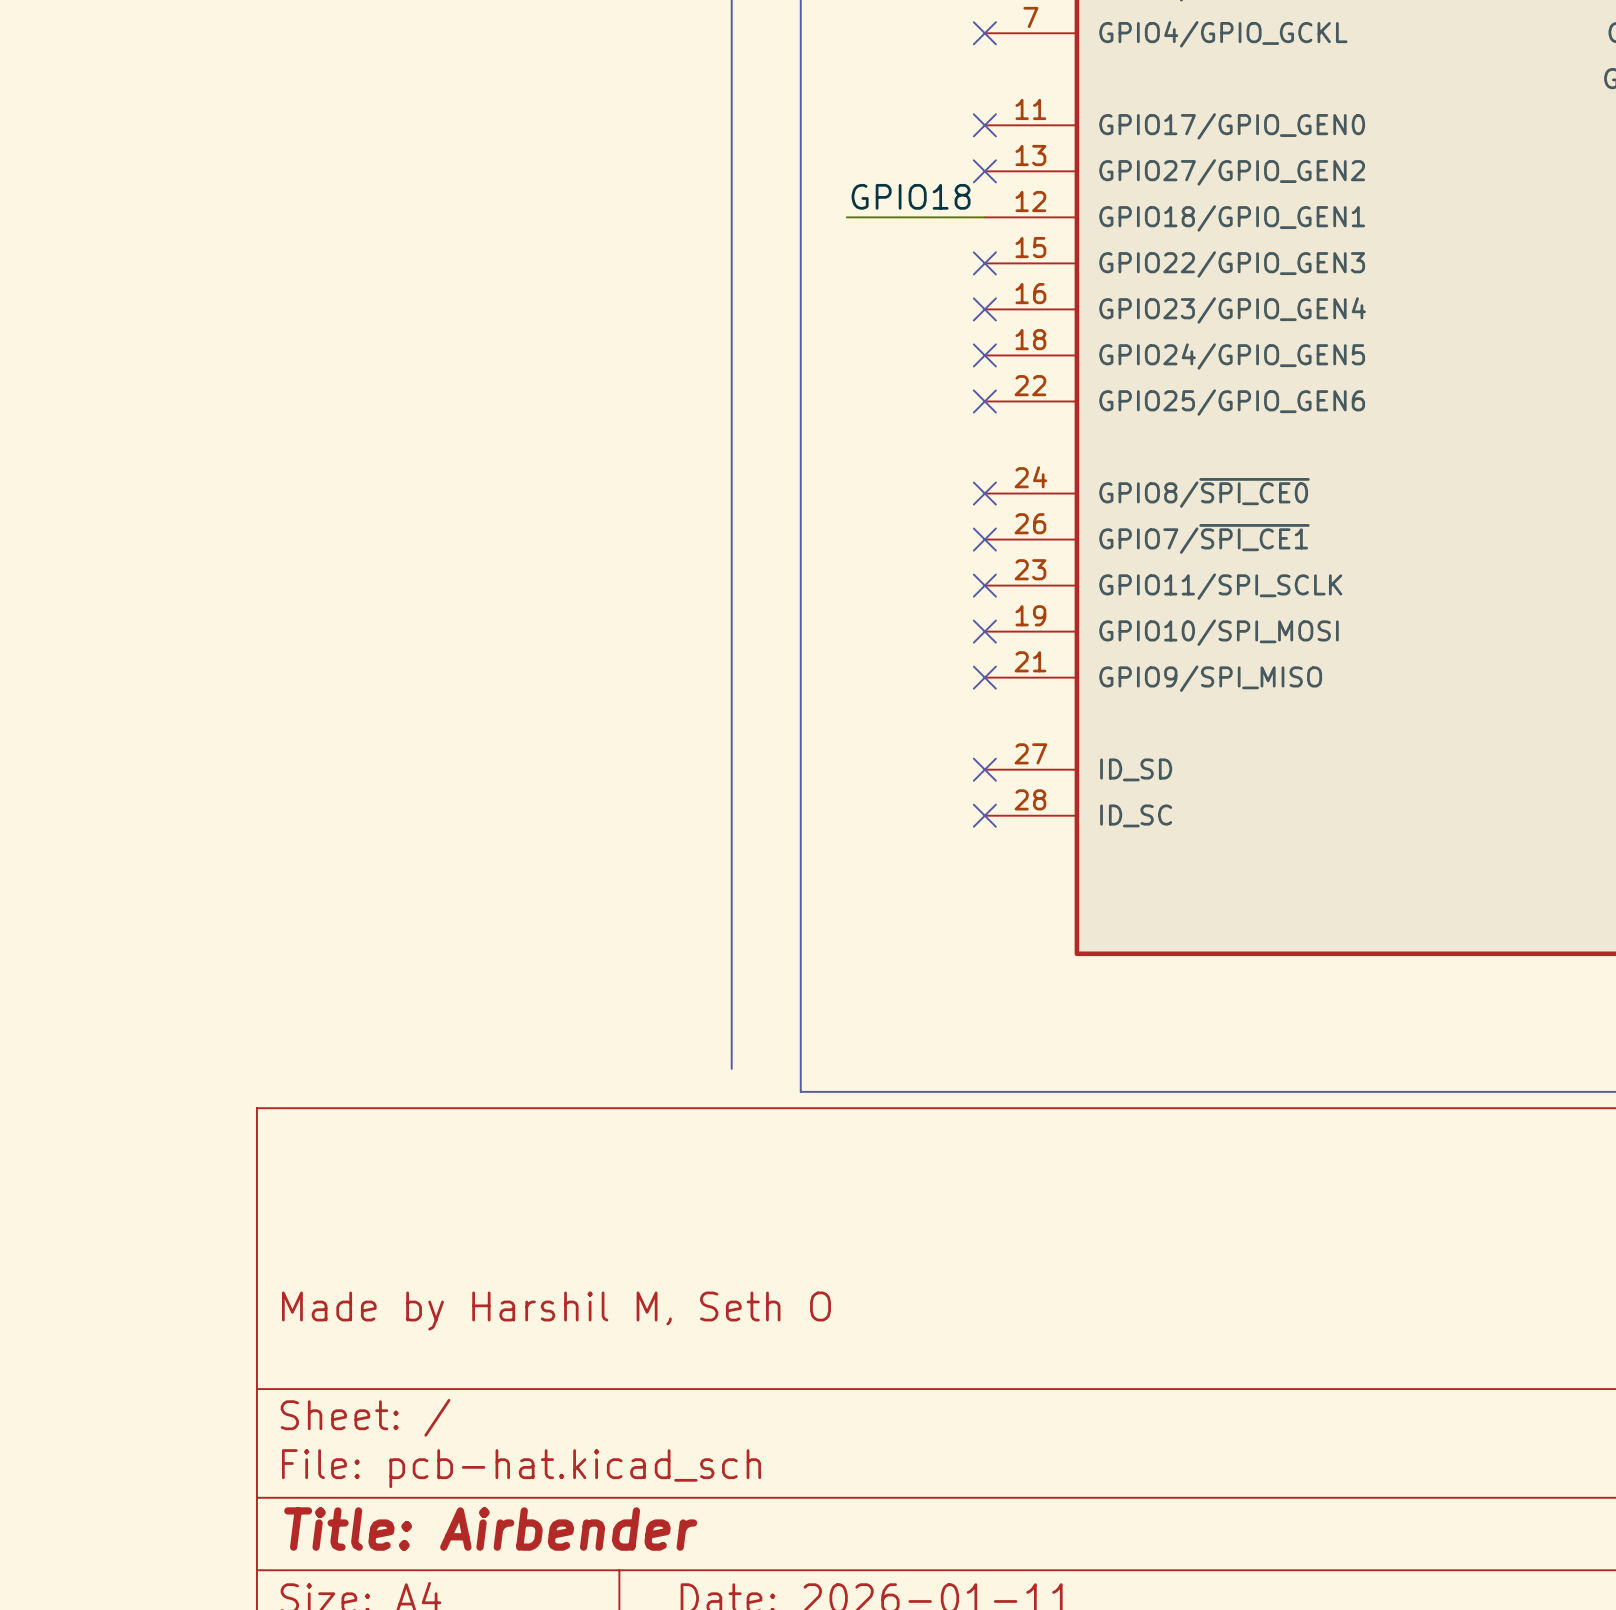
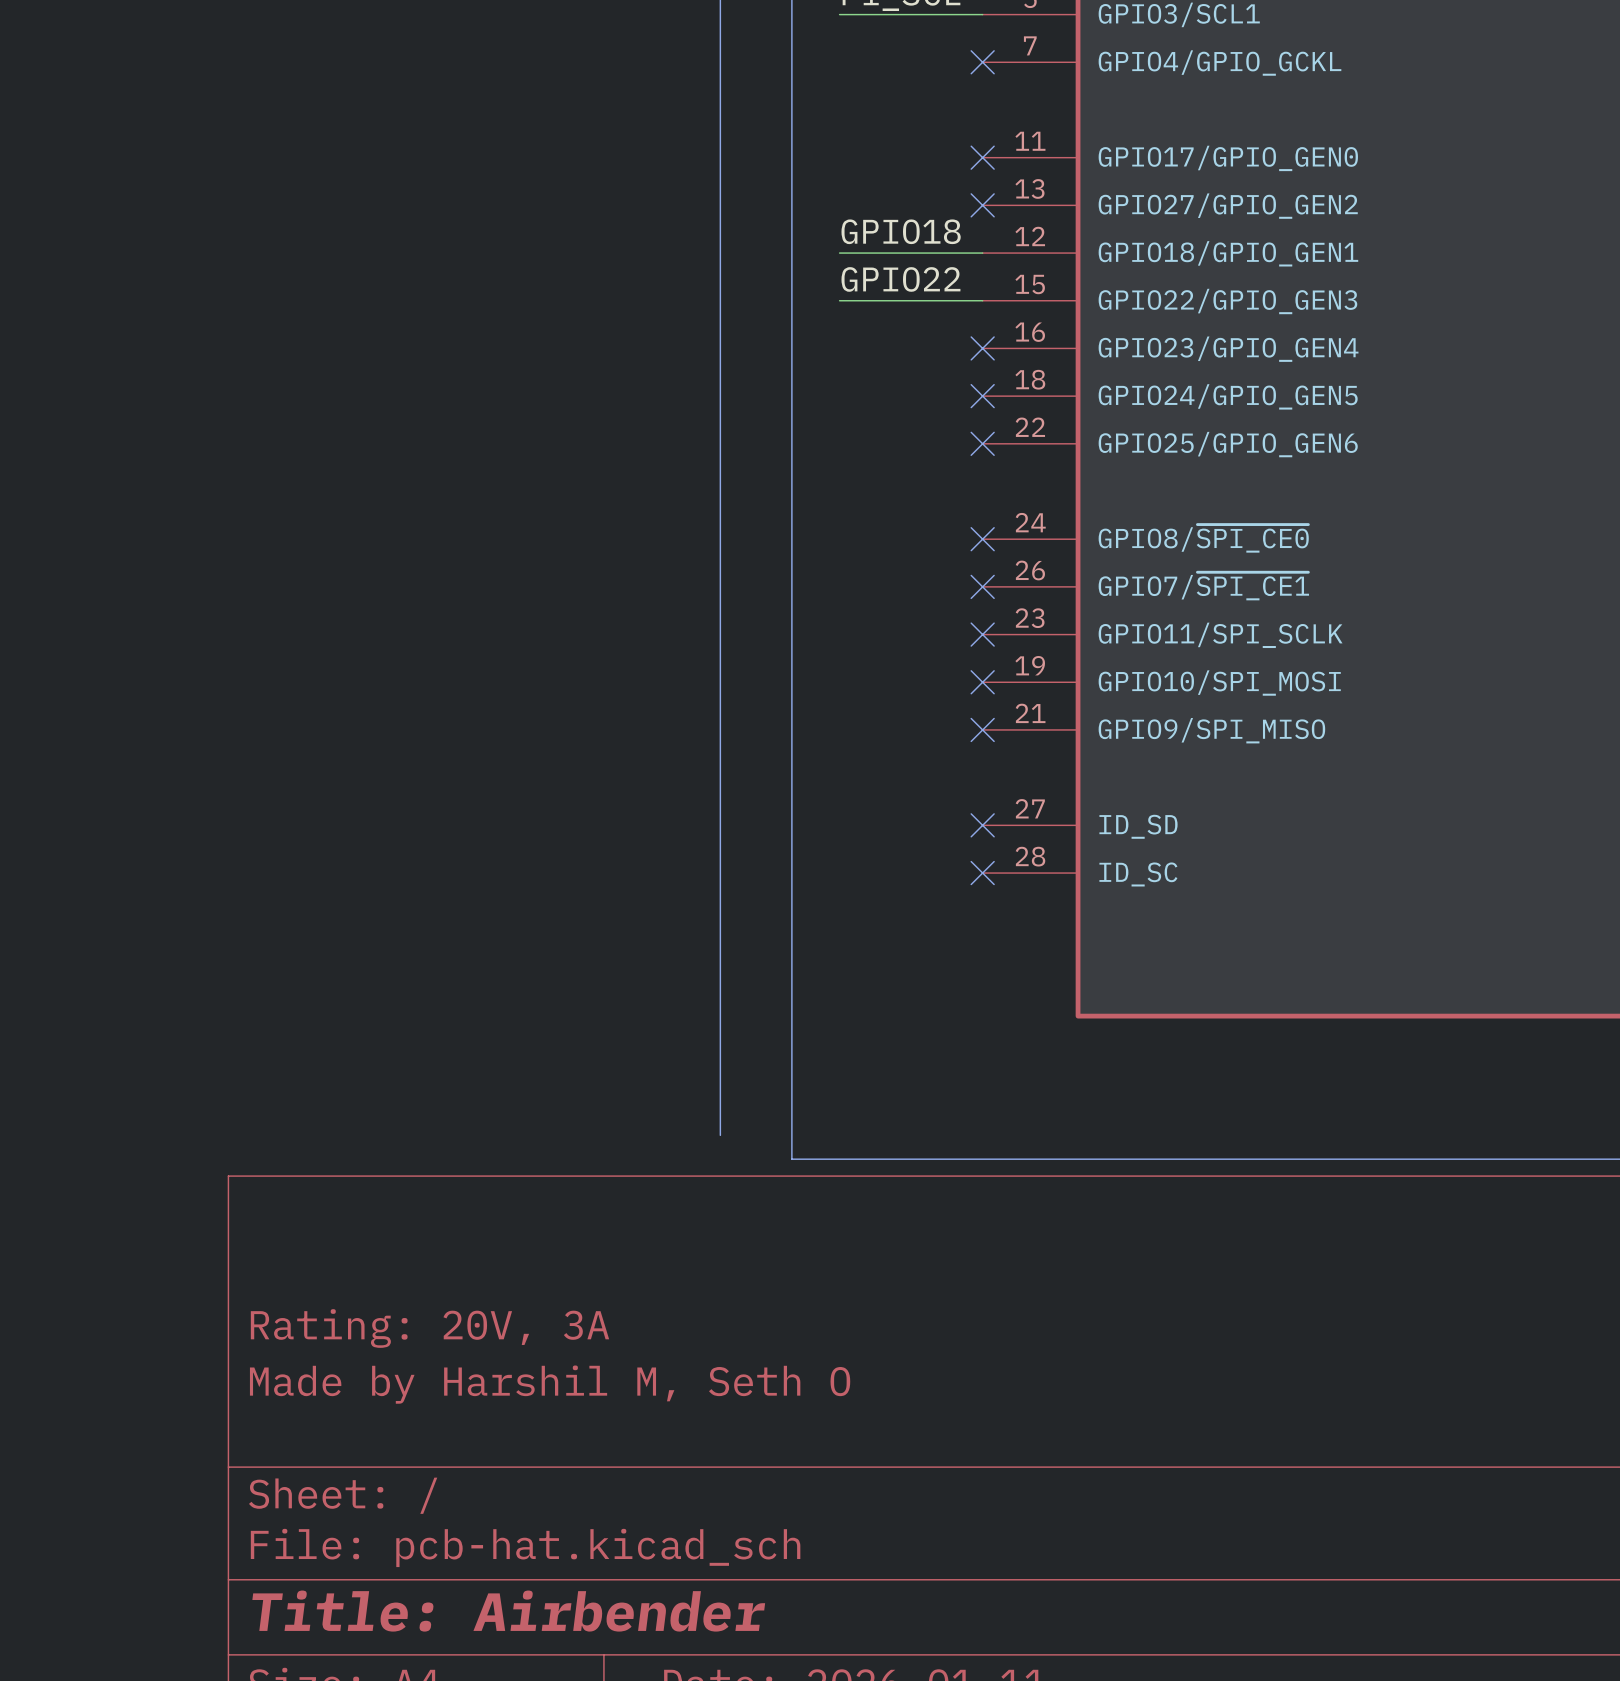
label: none -> GPIO22 (900, 279)
wire: none -> (839, 300) (982, 300)
no-connect mark: (984, 263) -> none
title block: none -> Rating: 20V, 3A (429, 1328)

